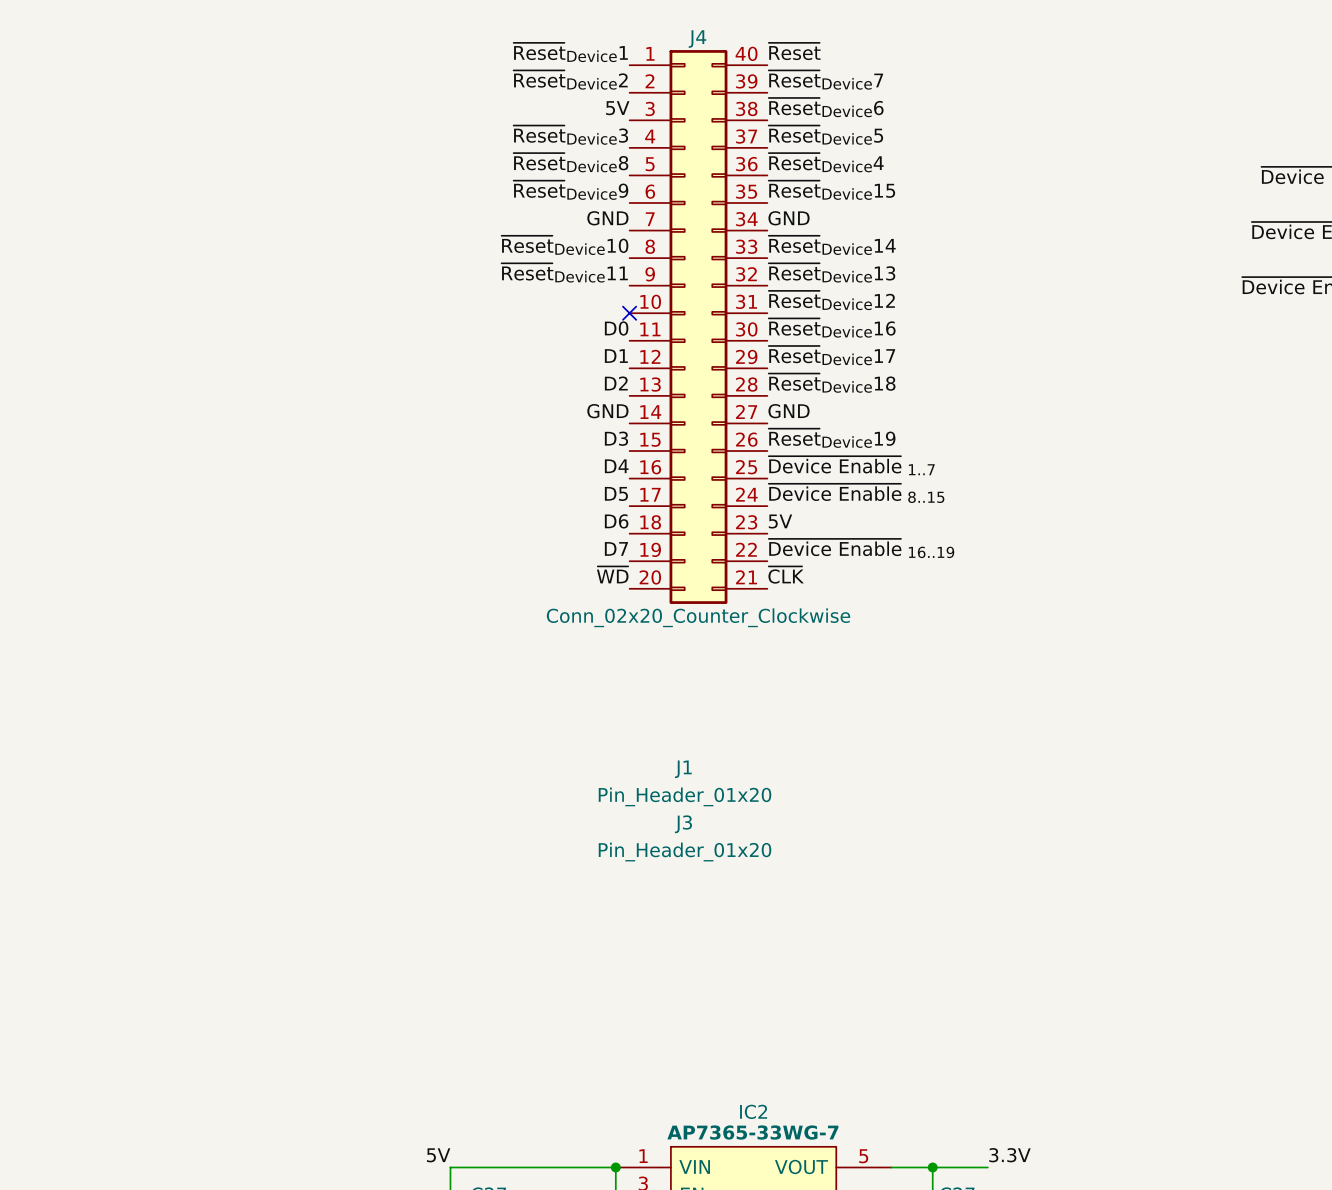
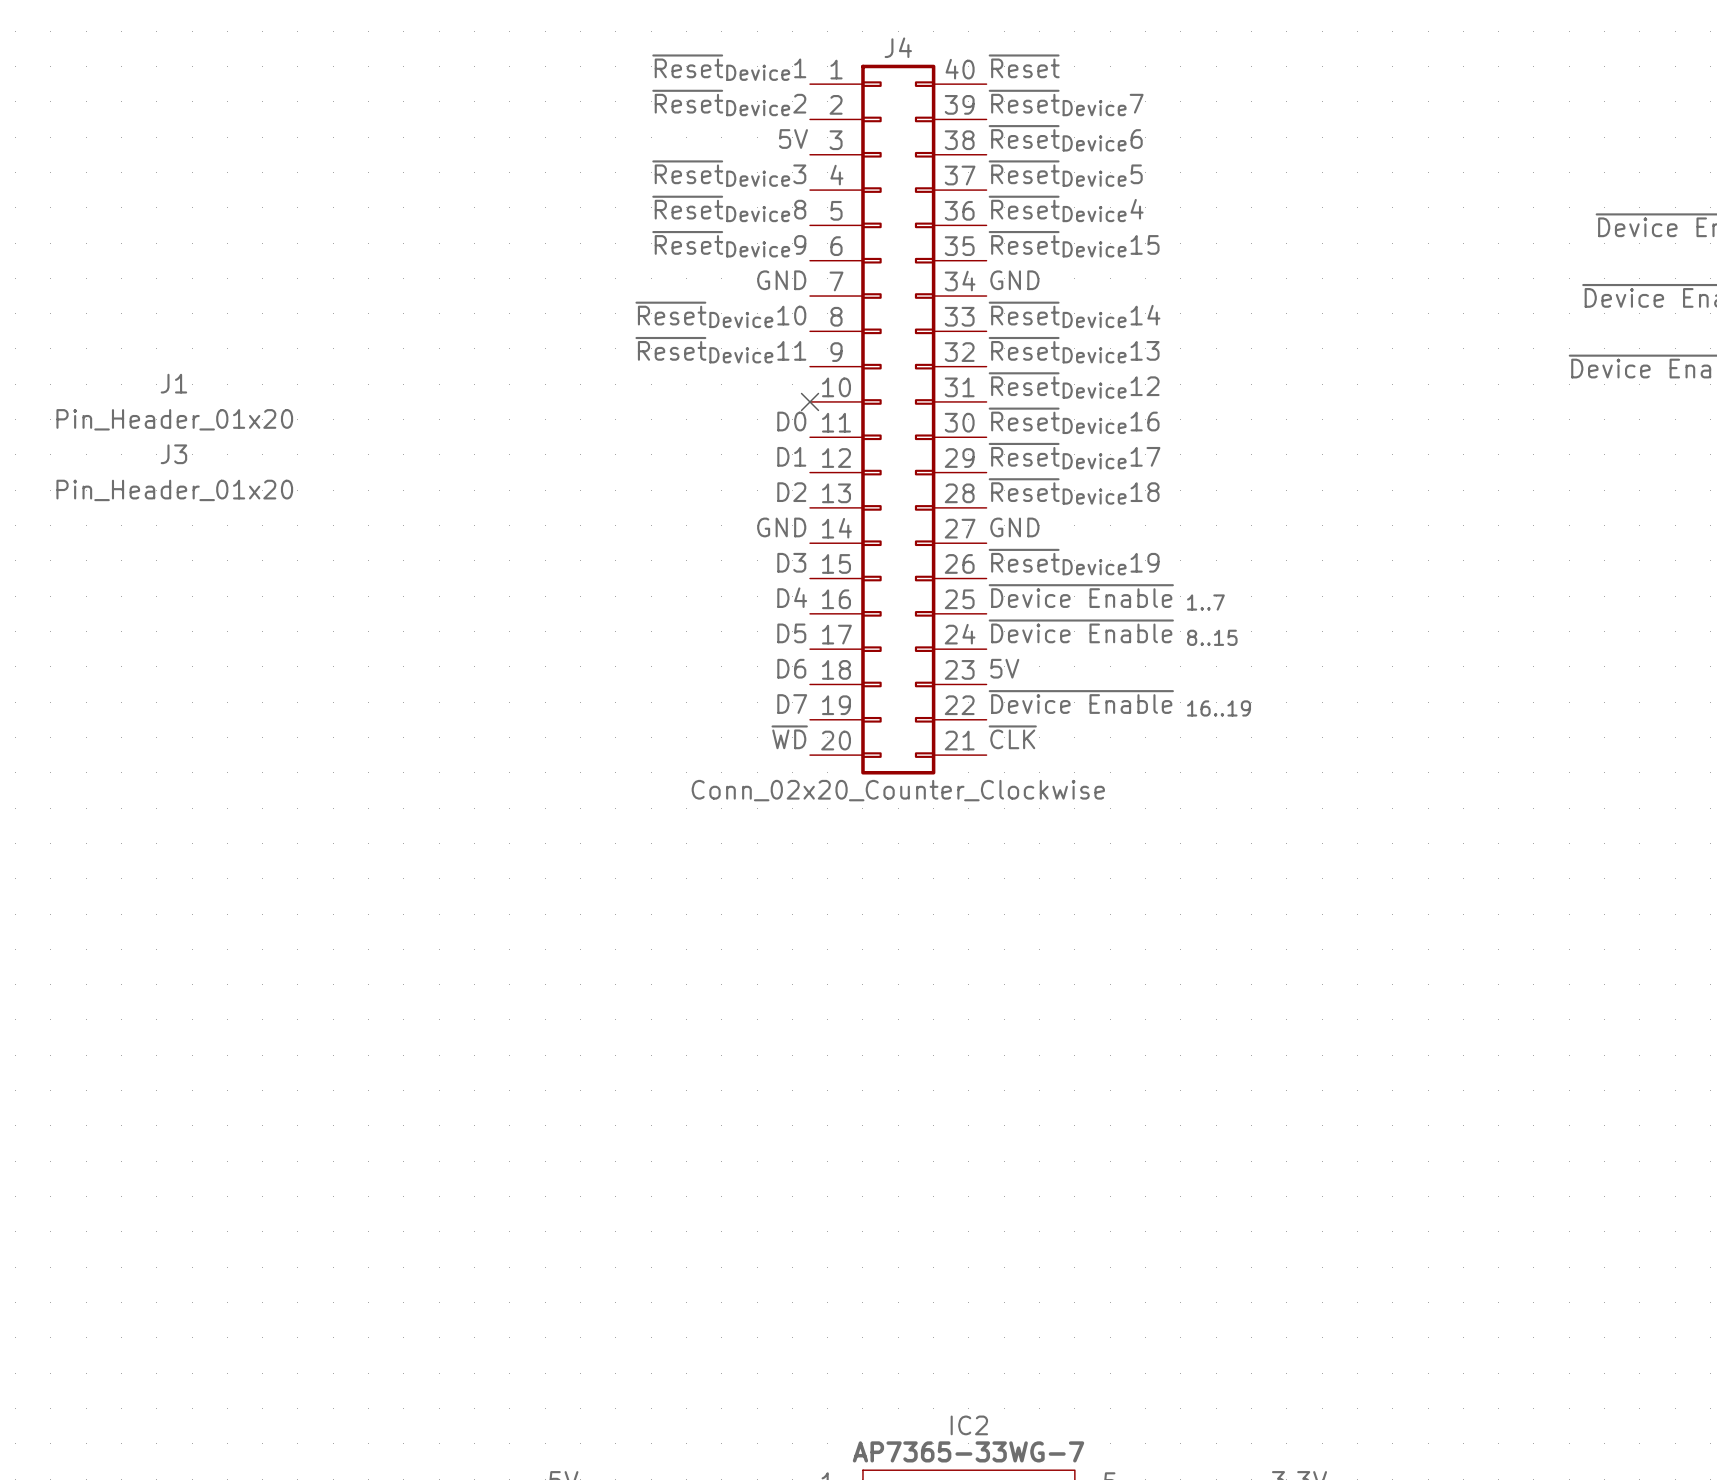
J1 position: (685, 783) -> (174, 402)
J3 position: (685, 838) -> (174, 472)

